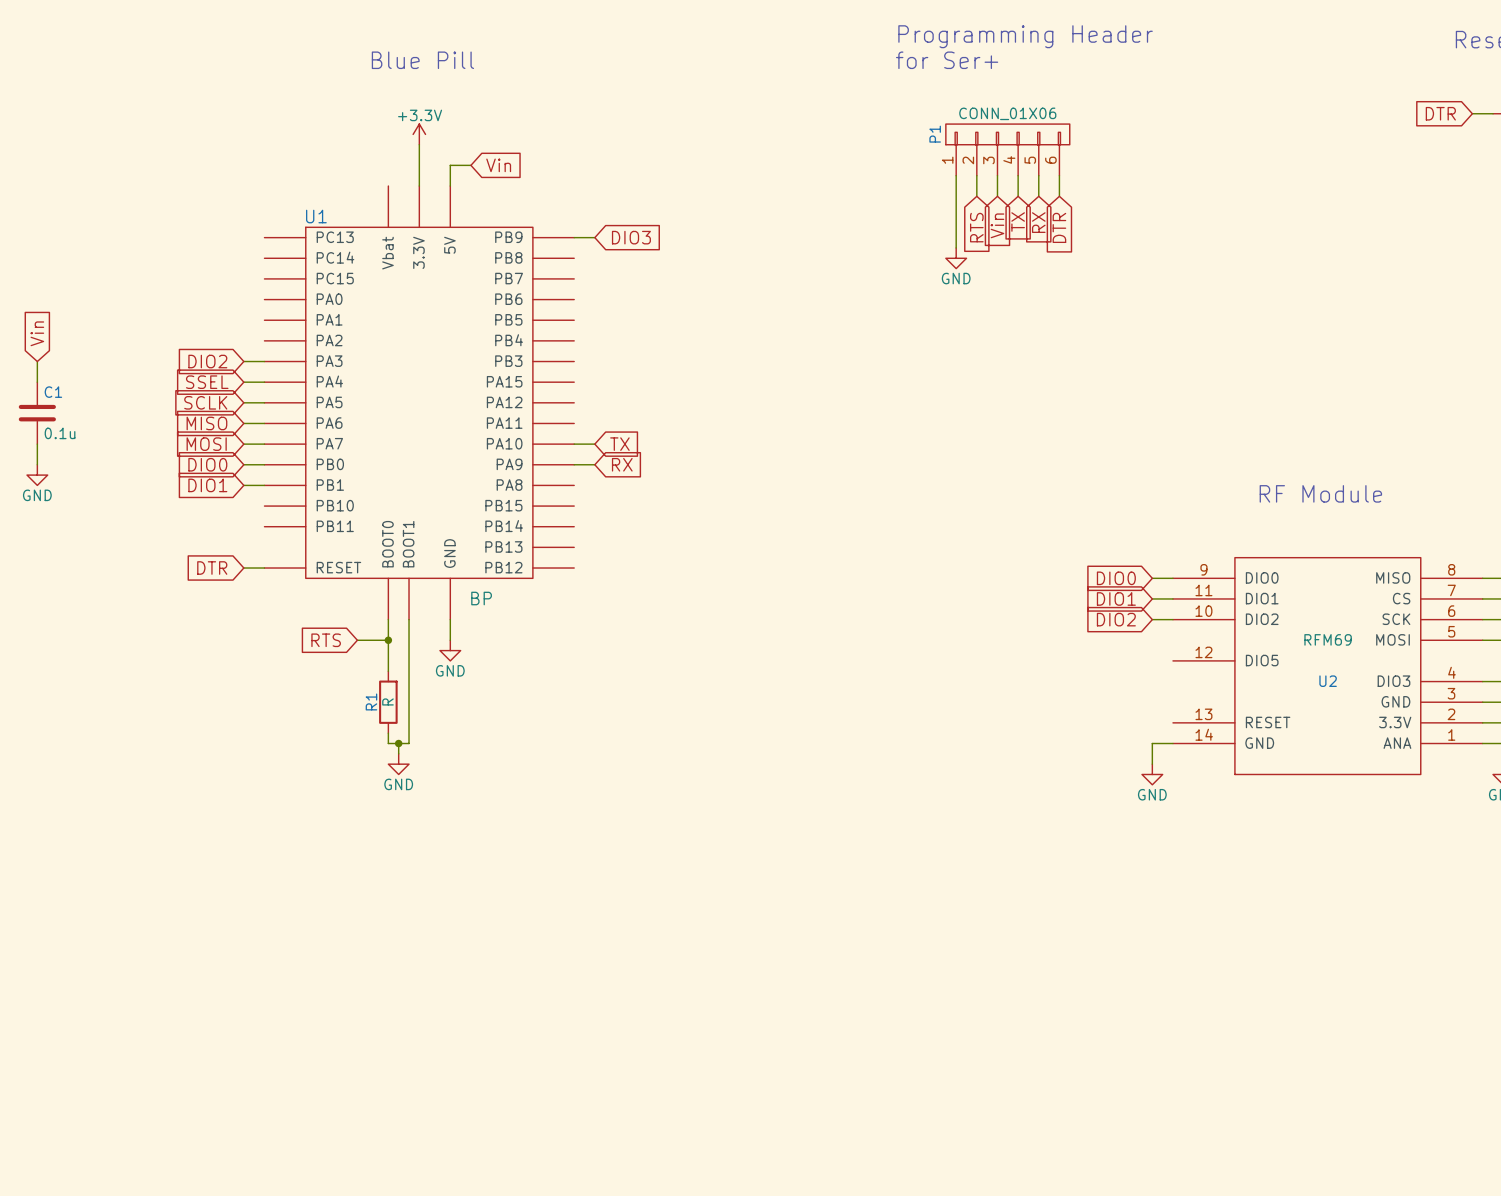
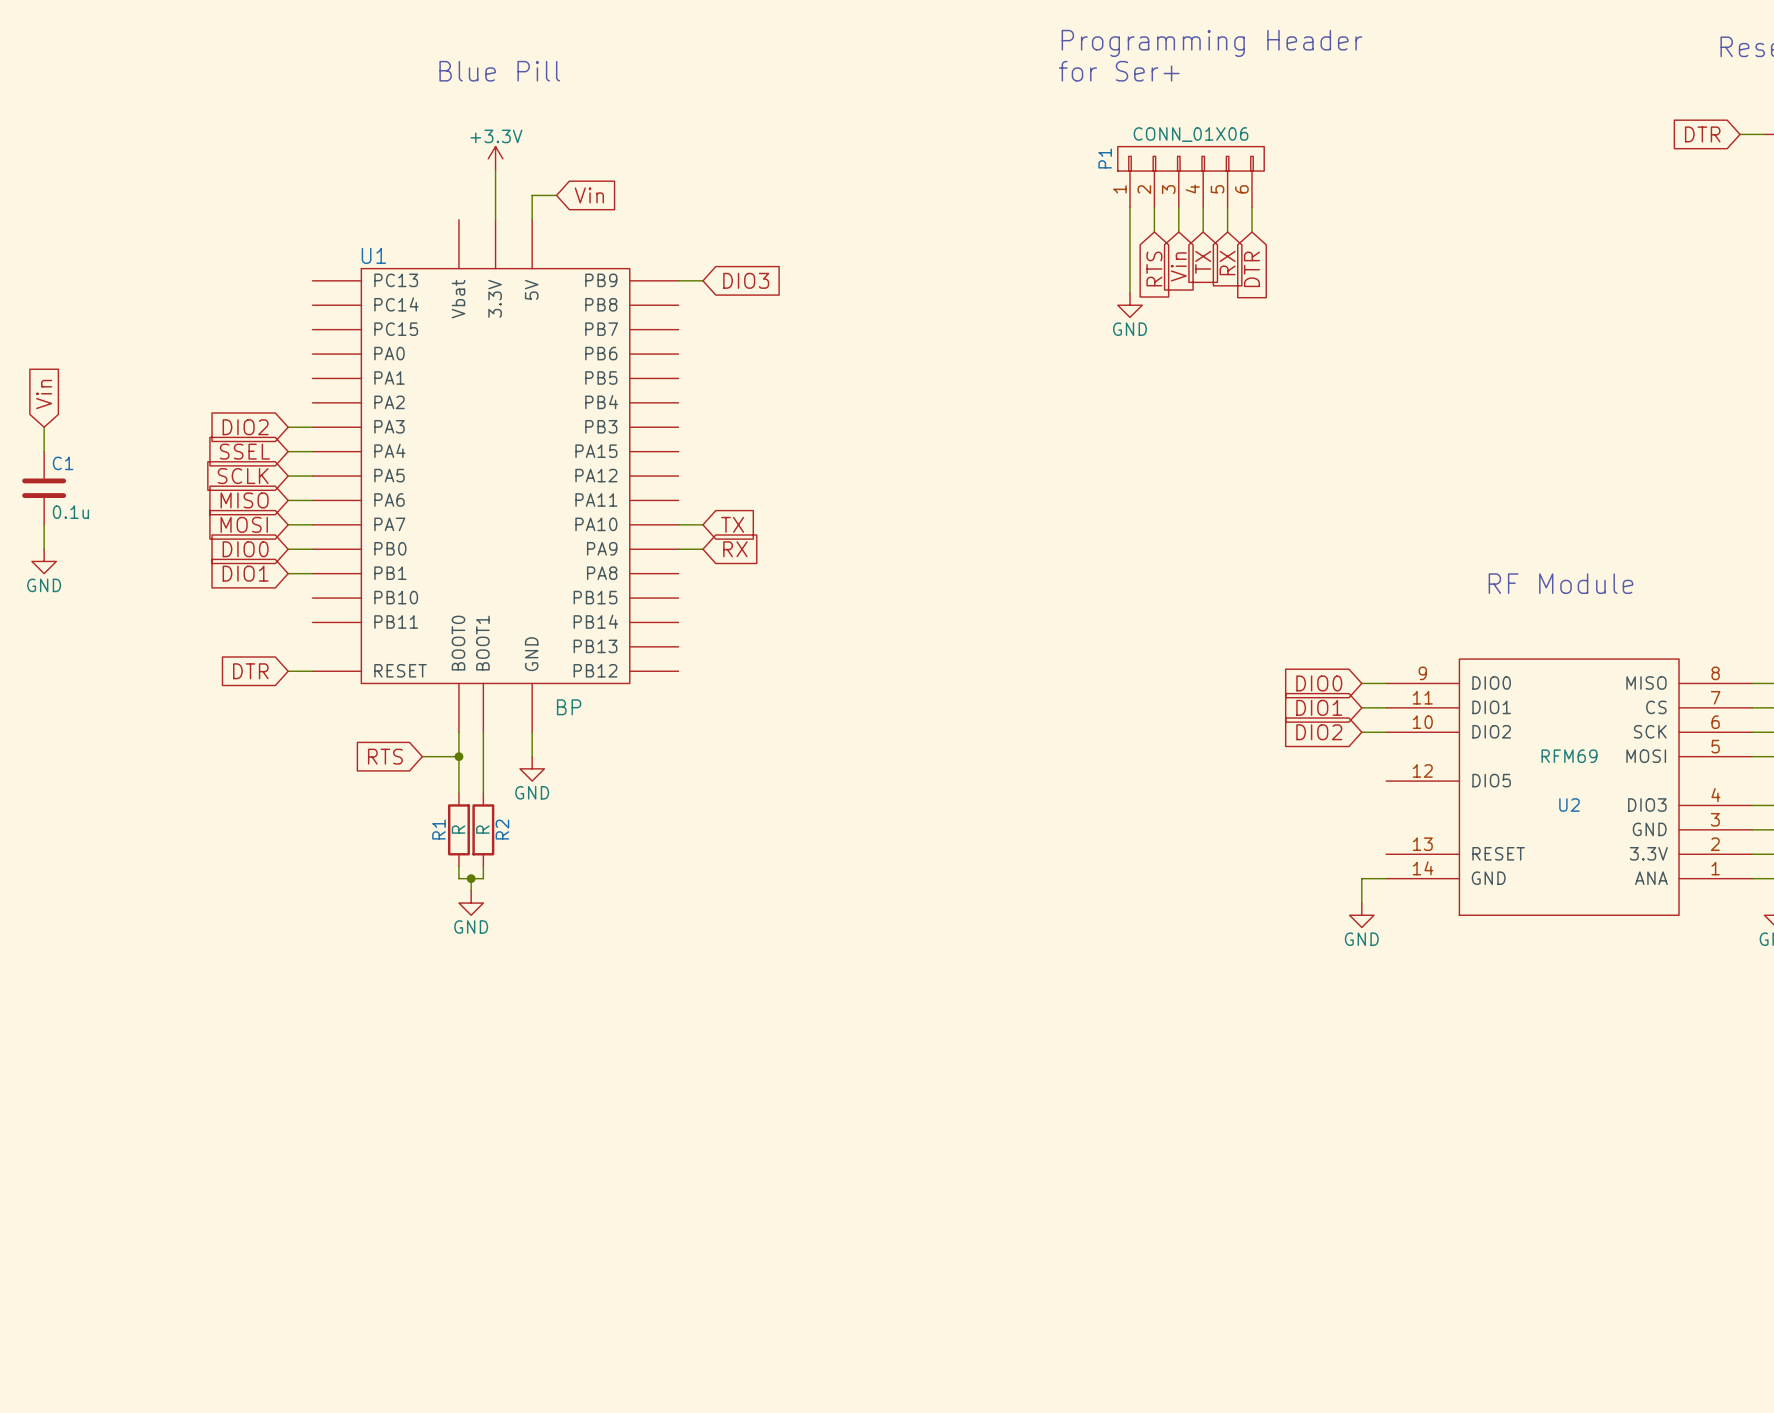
wire: (409, 671) (409, 733) -> none
R2: none -> R (483, 829)

